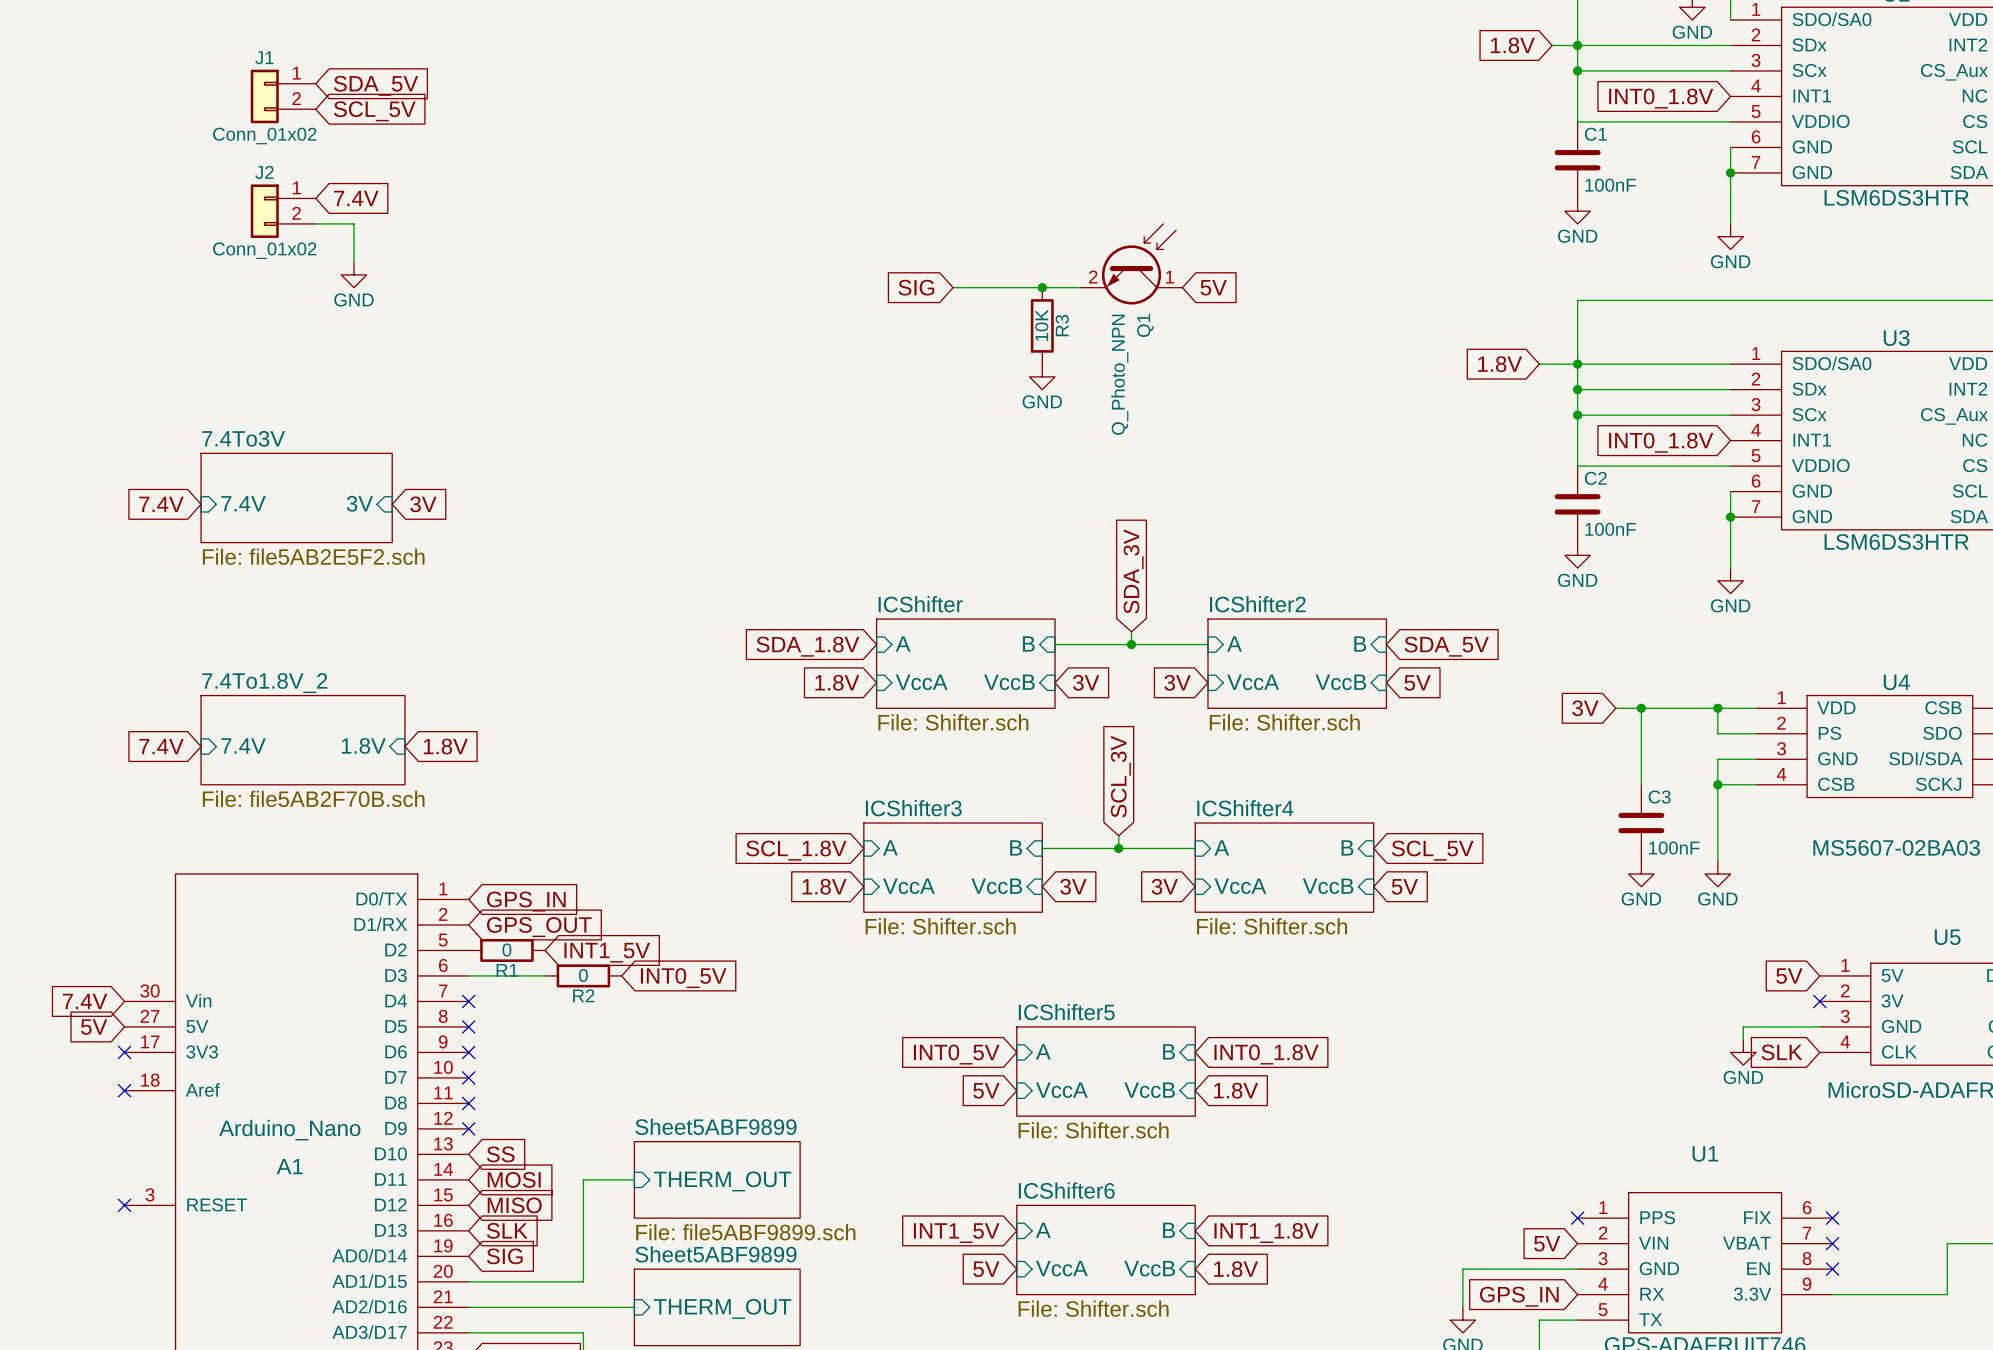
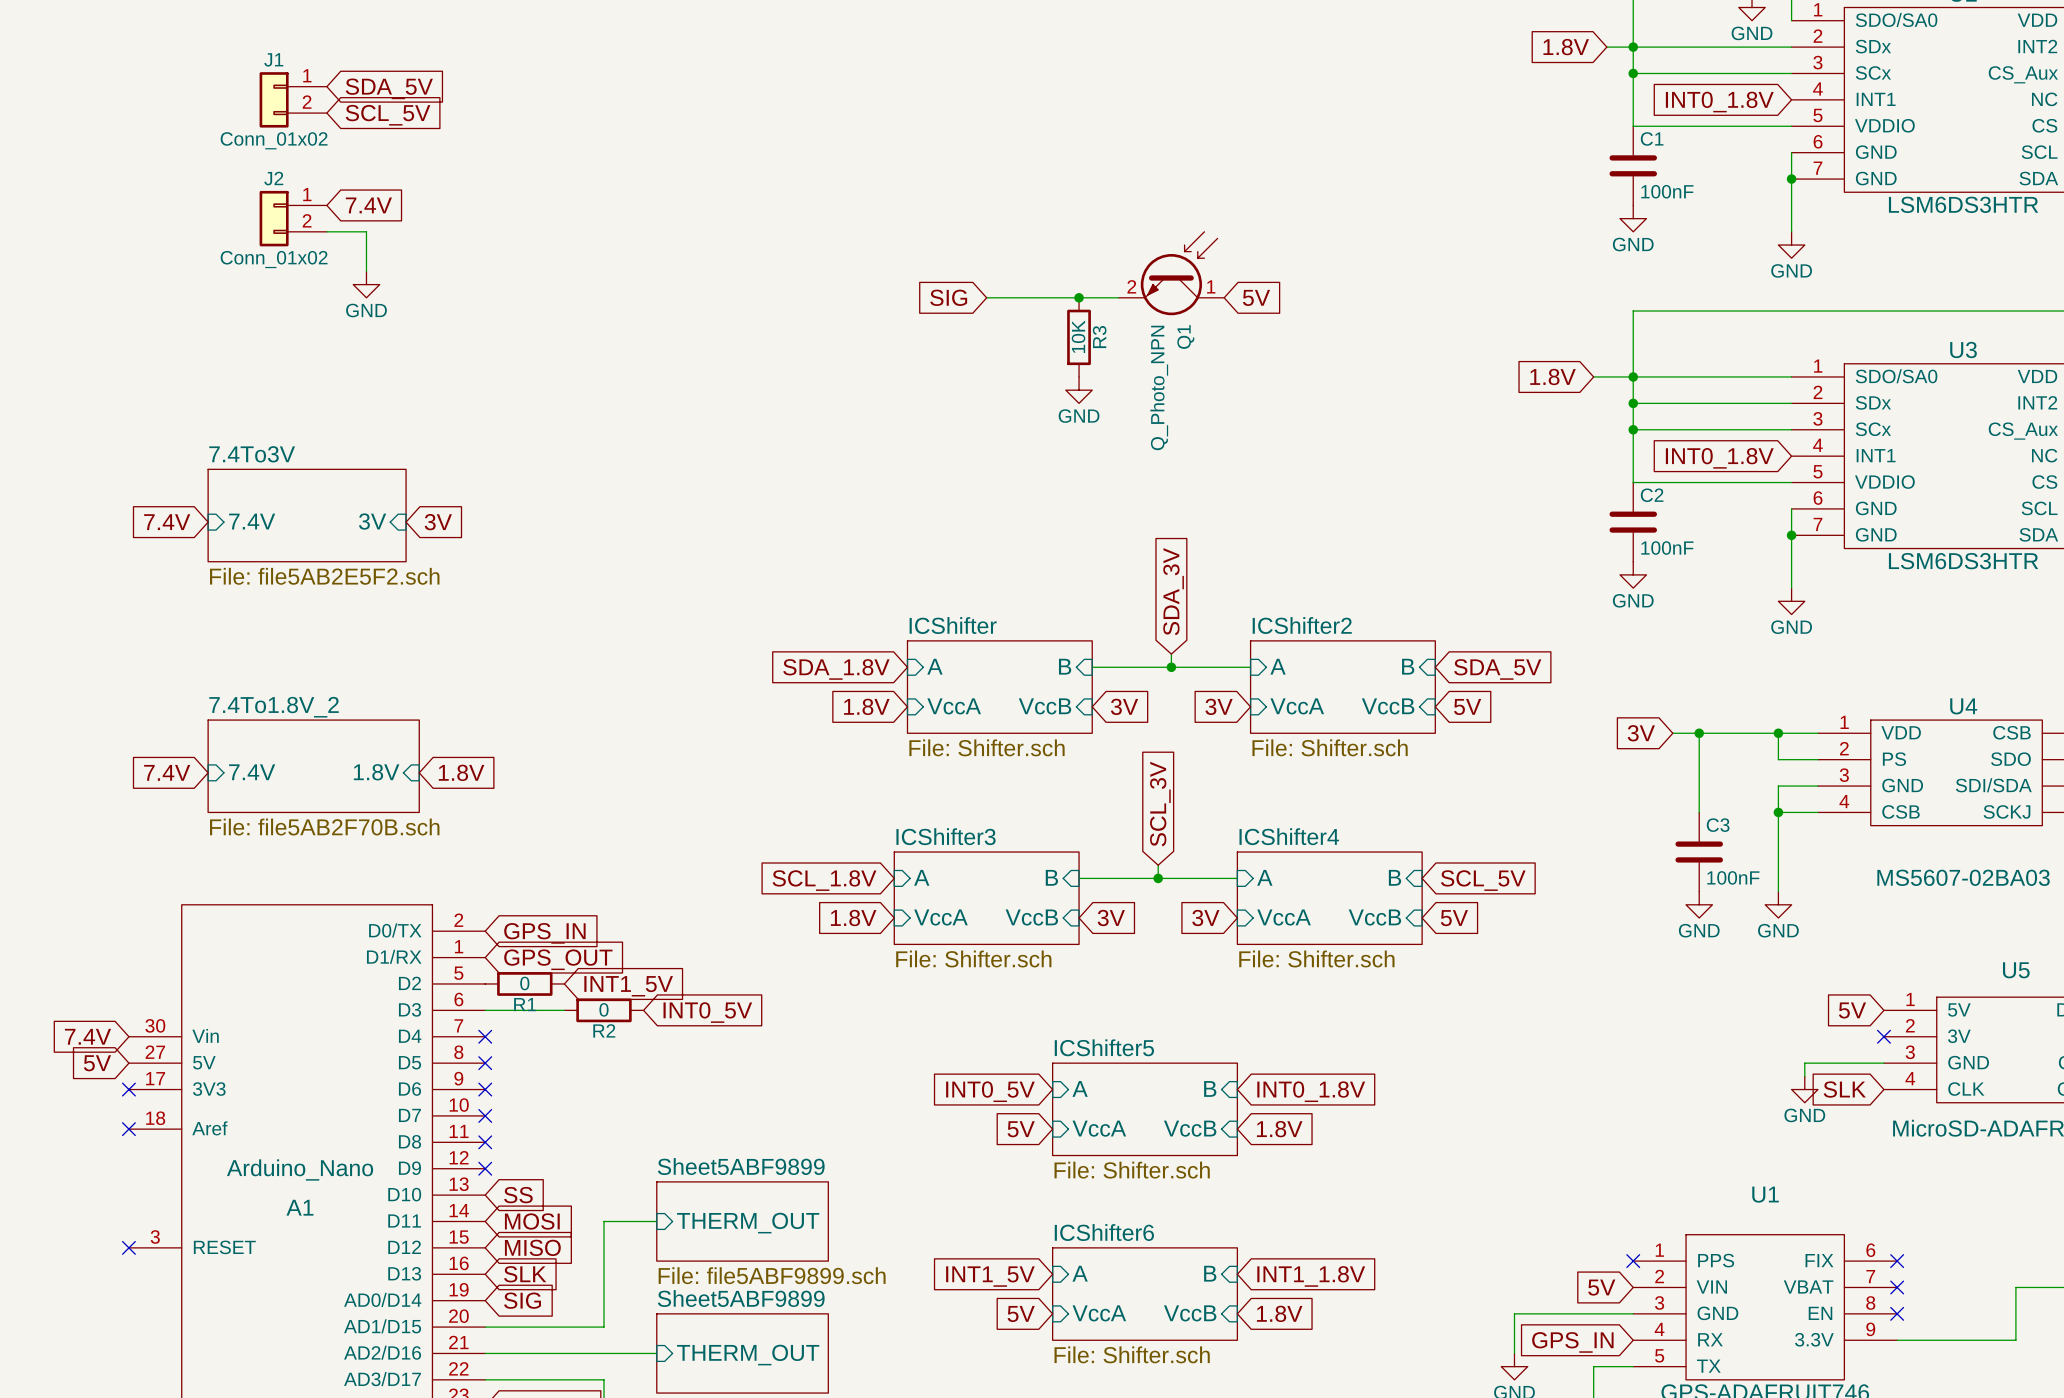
A1 pin number: 1 (443, 888) -> 2 (458, 920)
A1 pin number: 2 (443, 914) -> 1 (459, 946)

